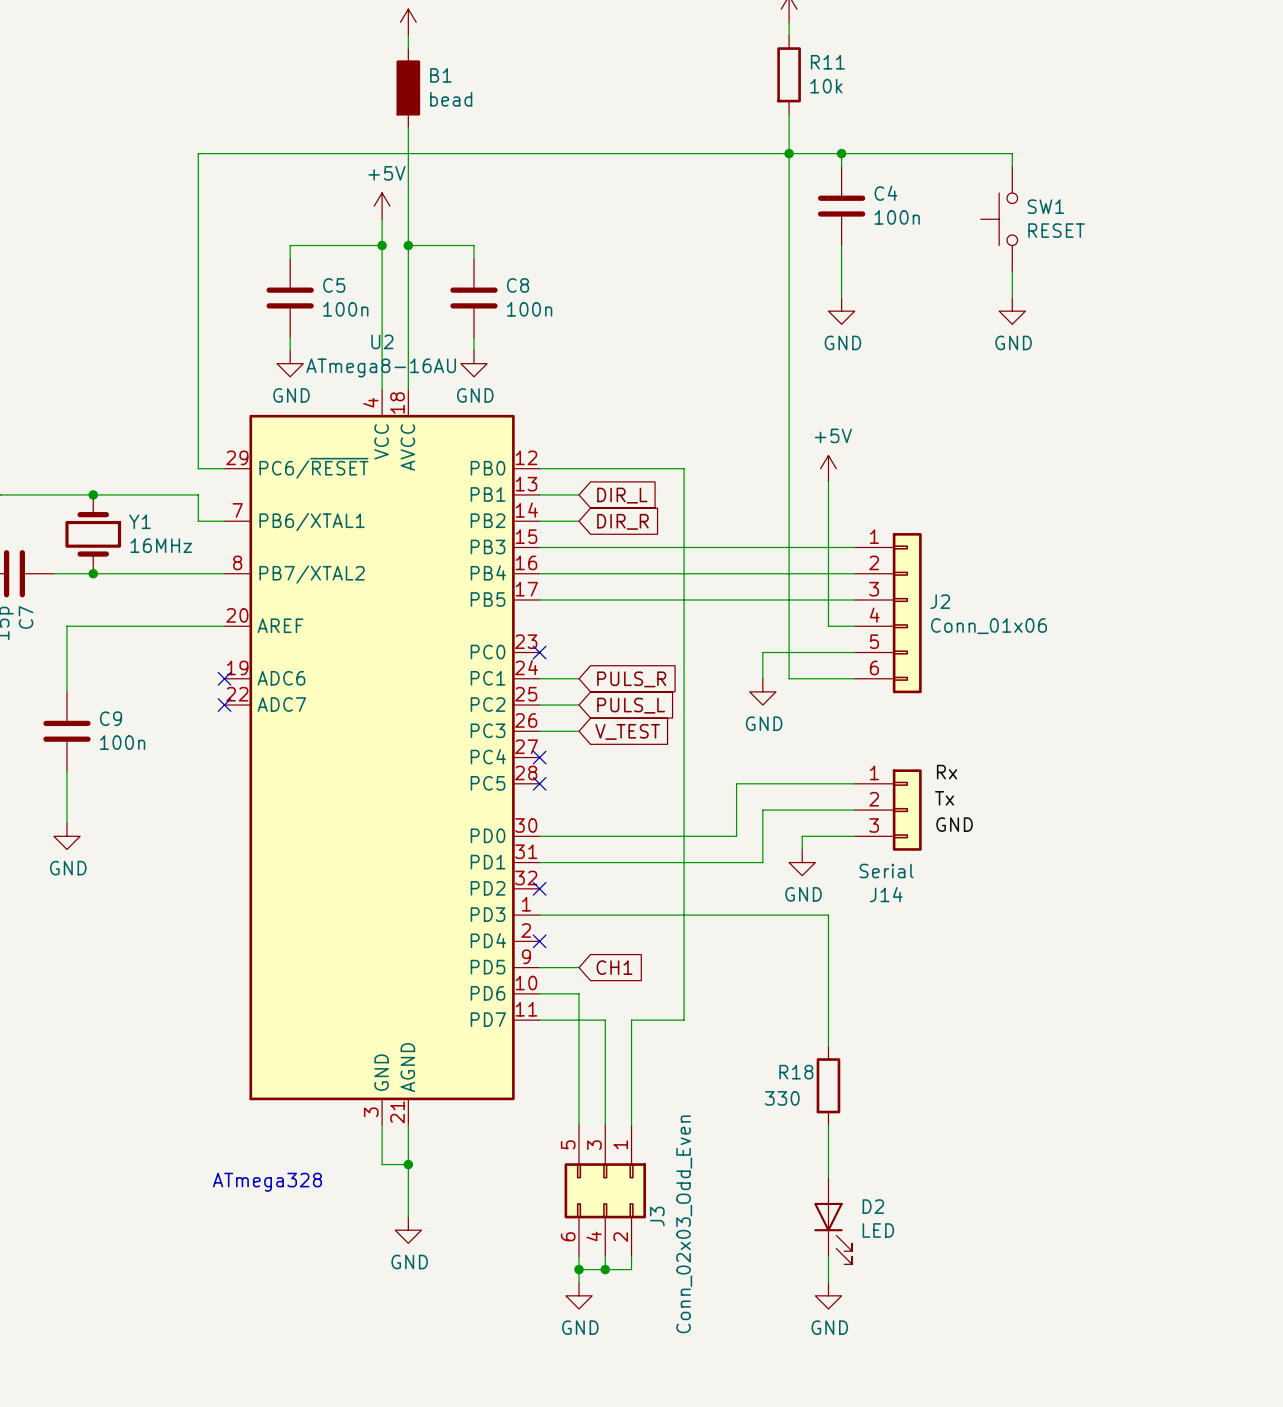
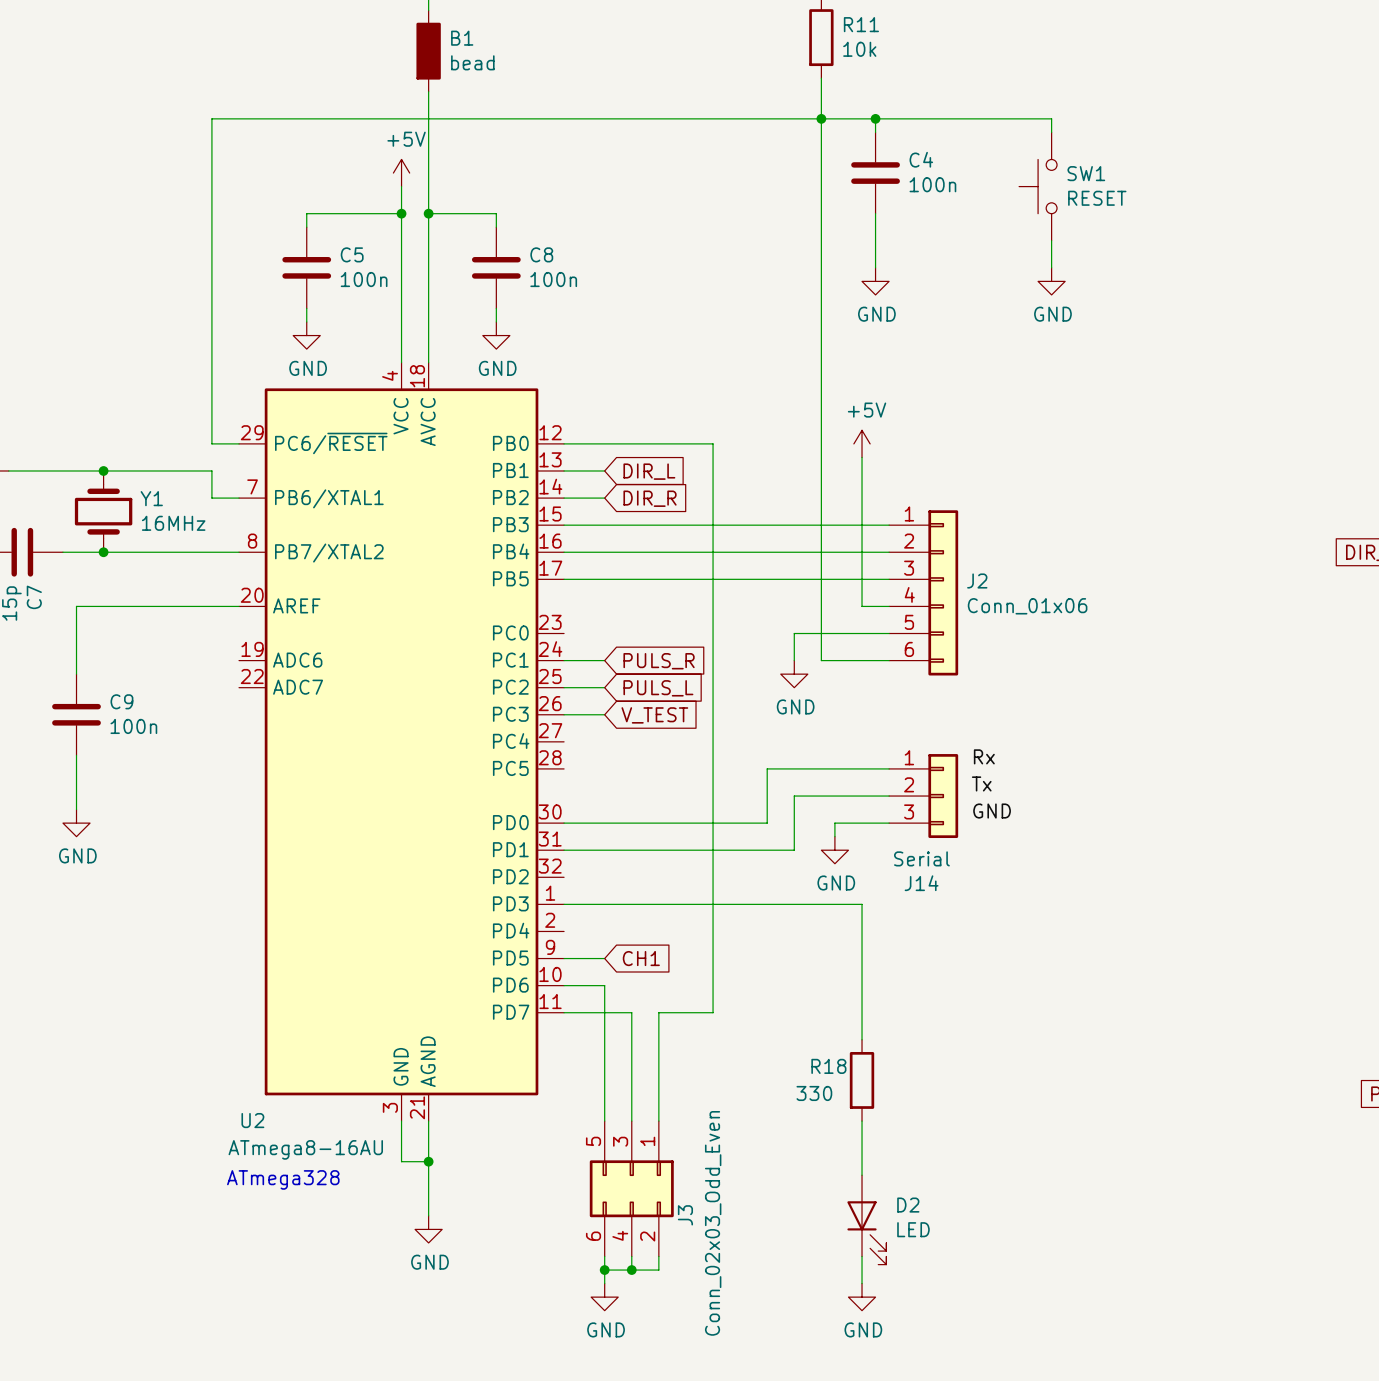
U2 name position: U2 (382, 341) -> U2 (252, 1120)
U2 value position: ATmega8-16AU (381, 367) -> ATmega8-16AU (305, 1149)
no-connect mark: (539, 652) -> none
no-connect mark: (224, 678) -> none
no-connect mark: (224, 705) -> none
no-connect mark: (539, 757) -> none
no-connect mark: (539, 783) -> none
no-connect mark: (539, 888) -> none
no-connect mark: (539, 941) -> none

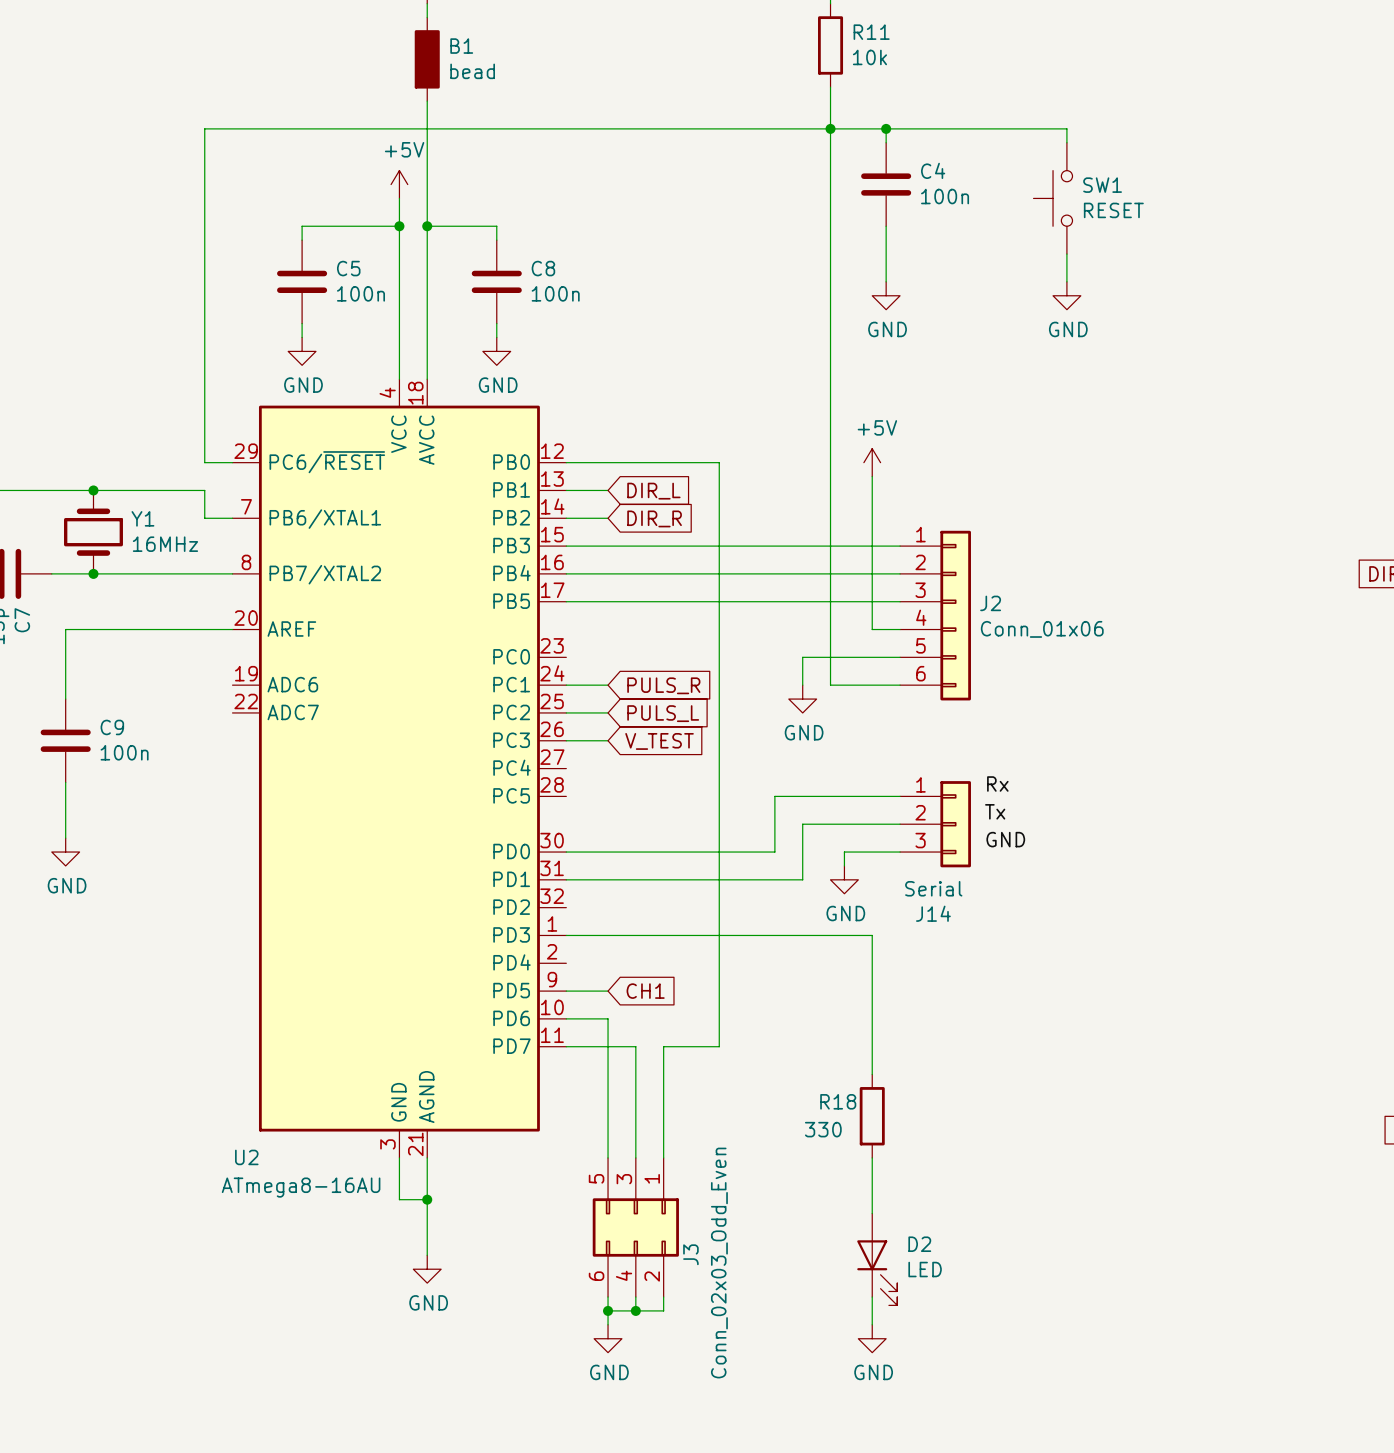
text: ATmega328 (283, 1179) -> none

